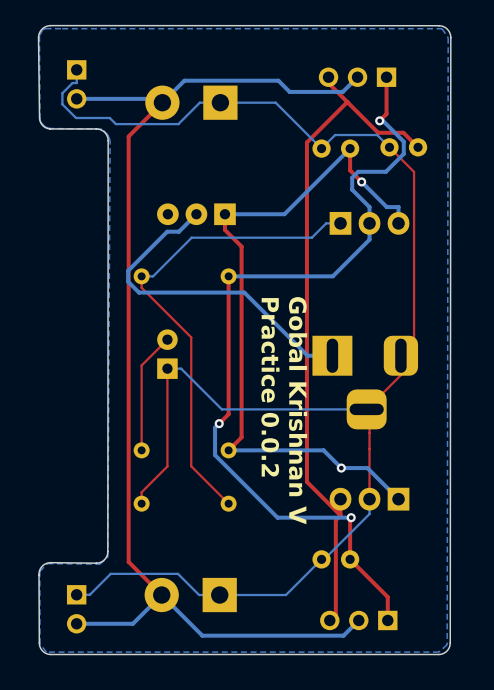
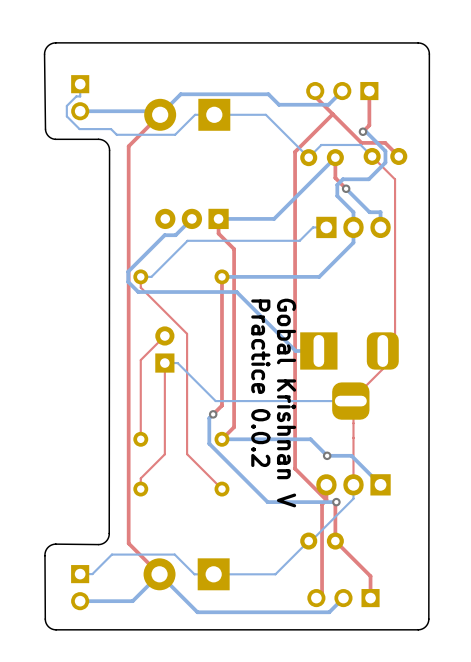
bottom zone outline: (45, 28) (39, 35) (41, 122) (45, 126) (50, 128) (102, 129) (110, 140) (107, 557) (99, 564) (47, 563) (39, 571) (40, 644) (46, 652) (438, 652) (447, 644) (448, 37) (442, 28) (45, 28) -> none

